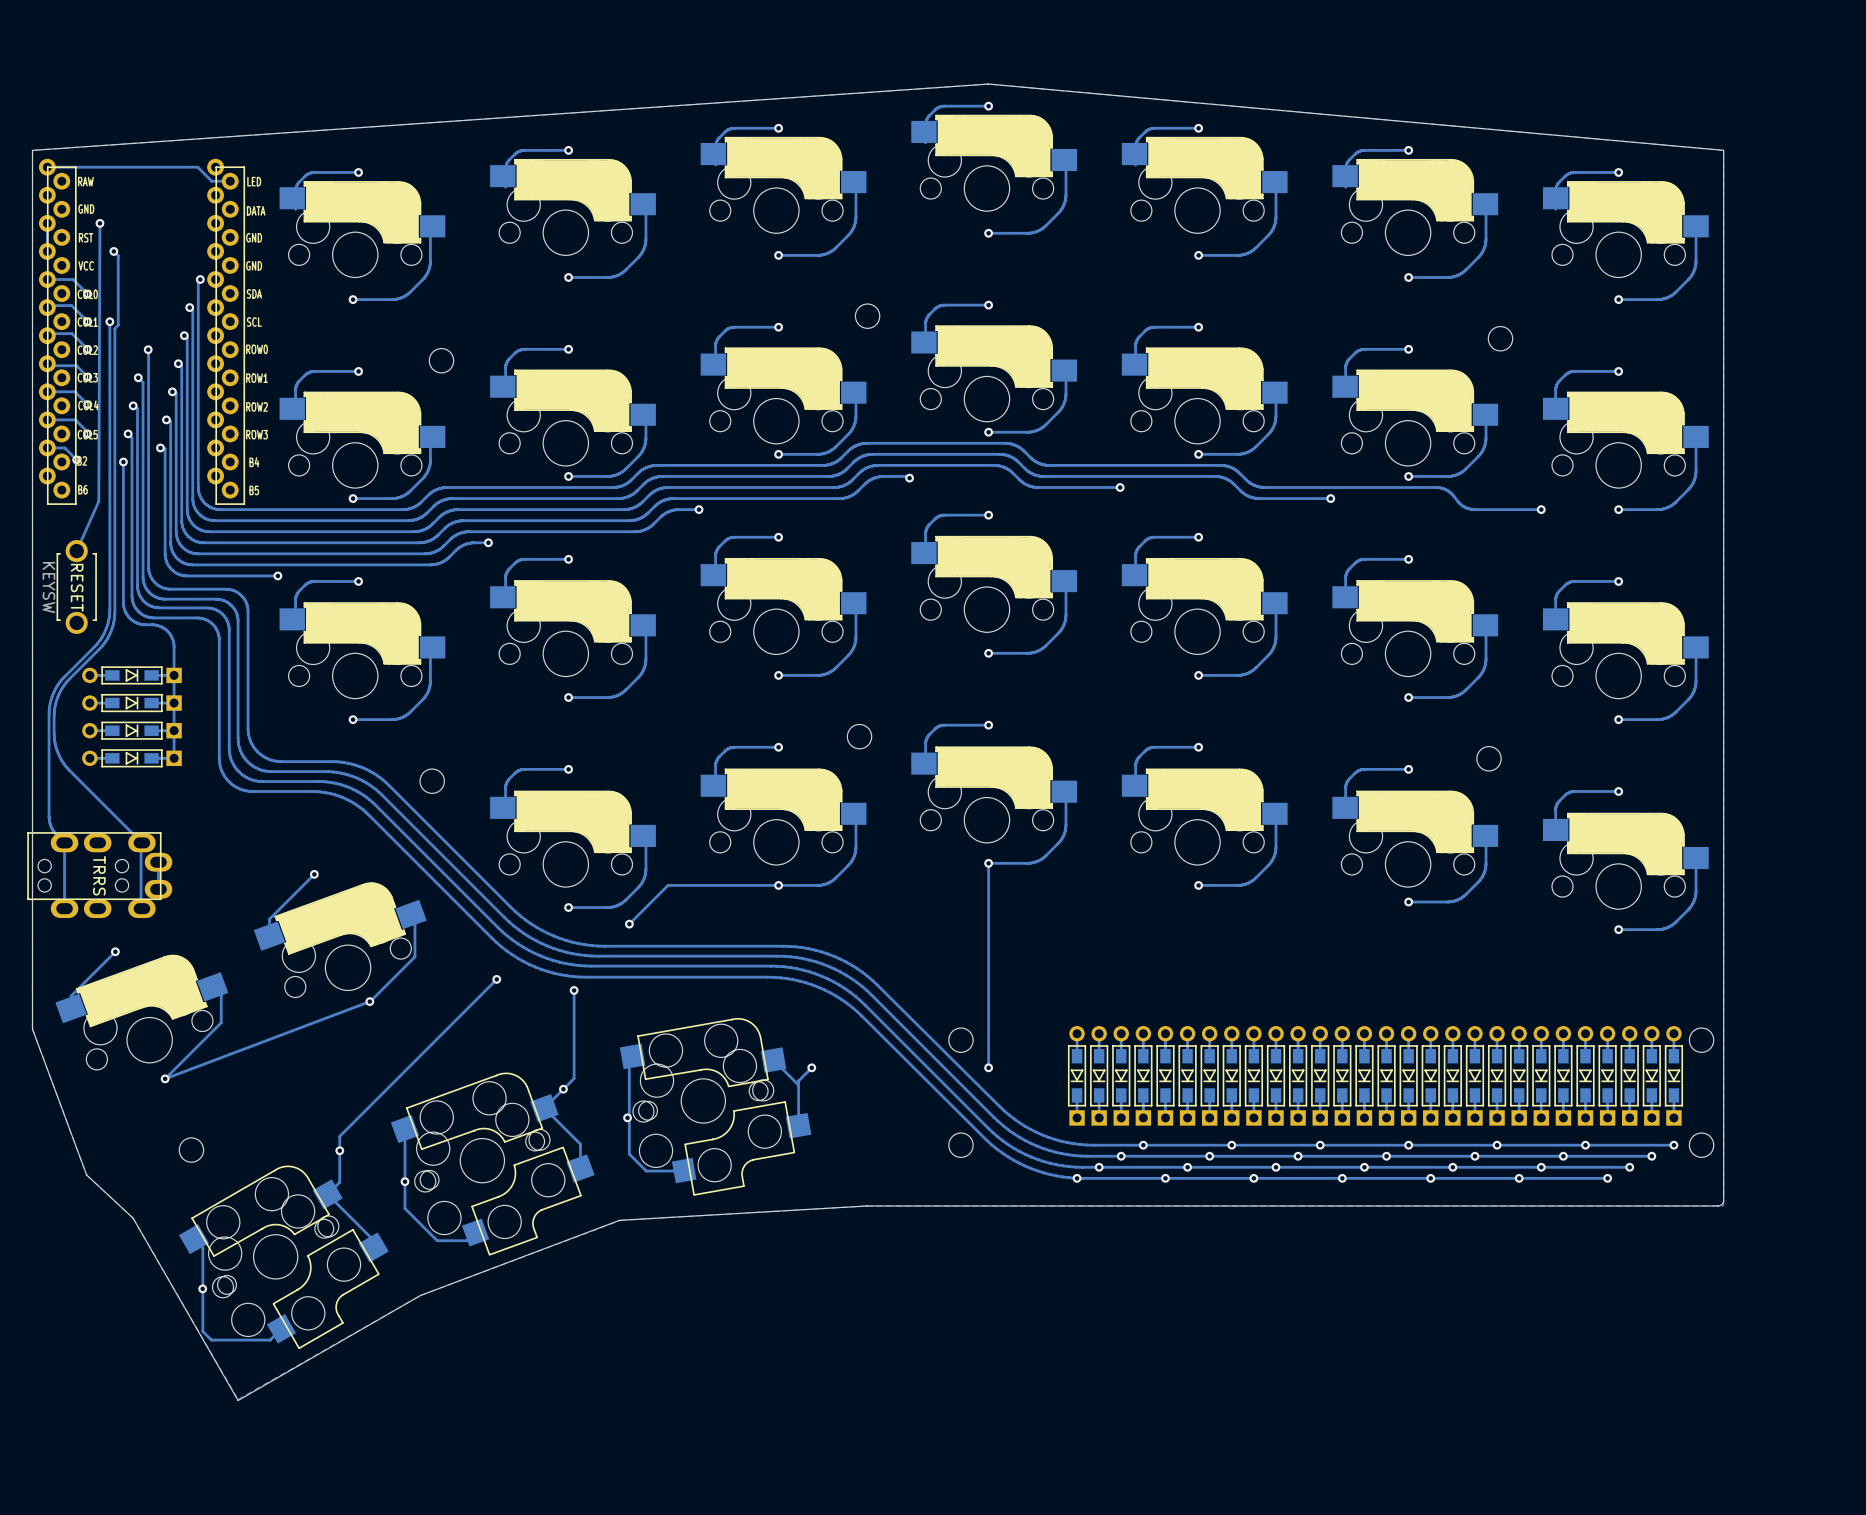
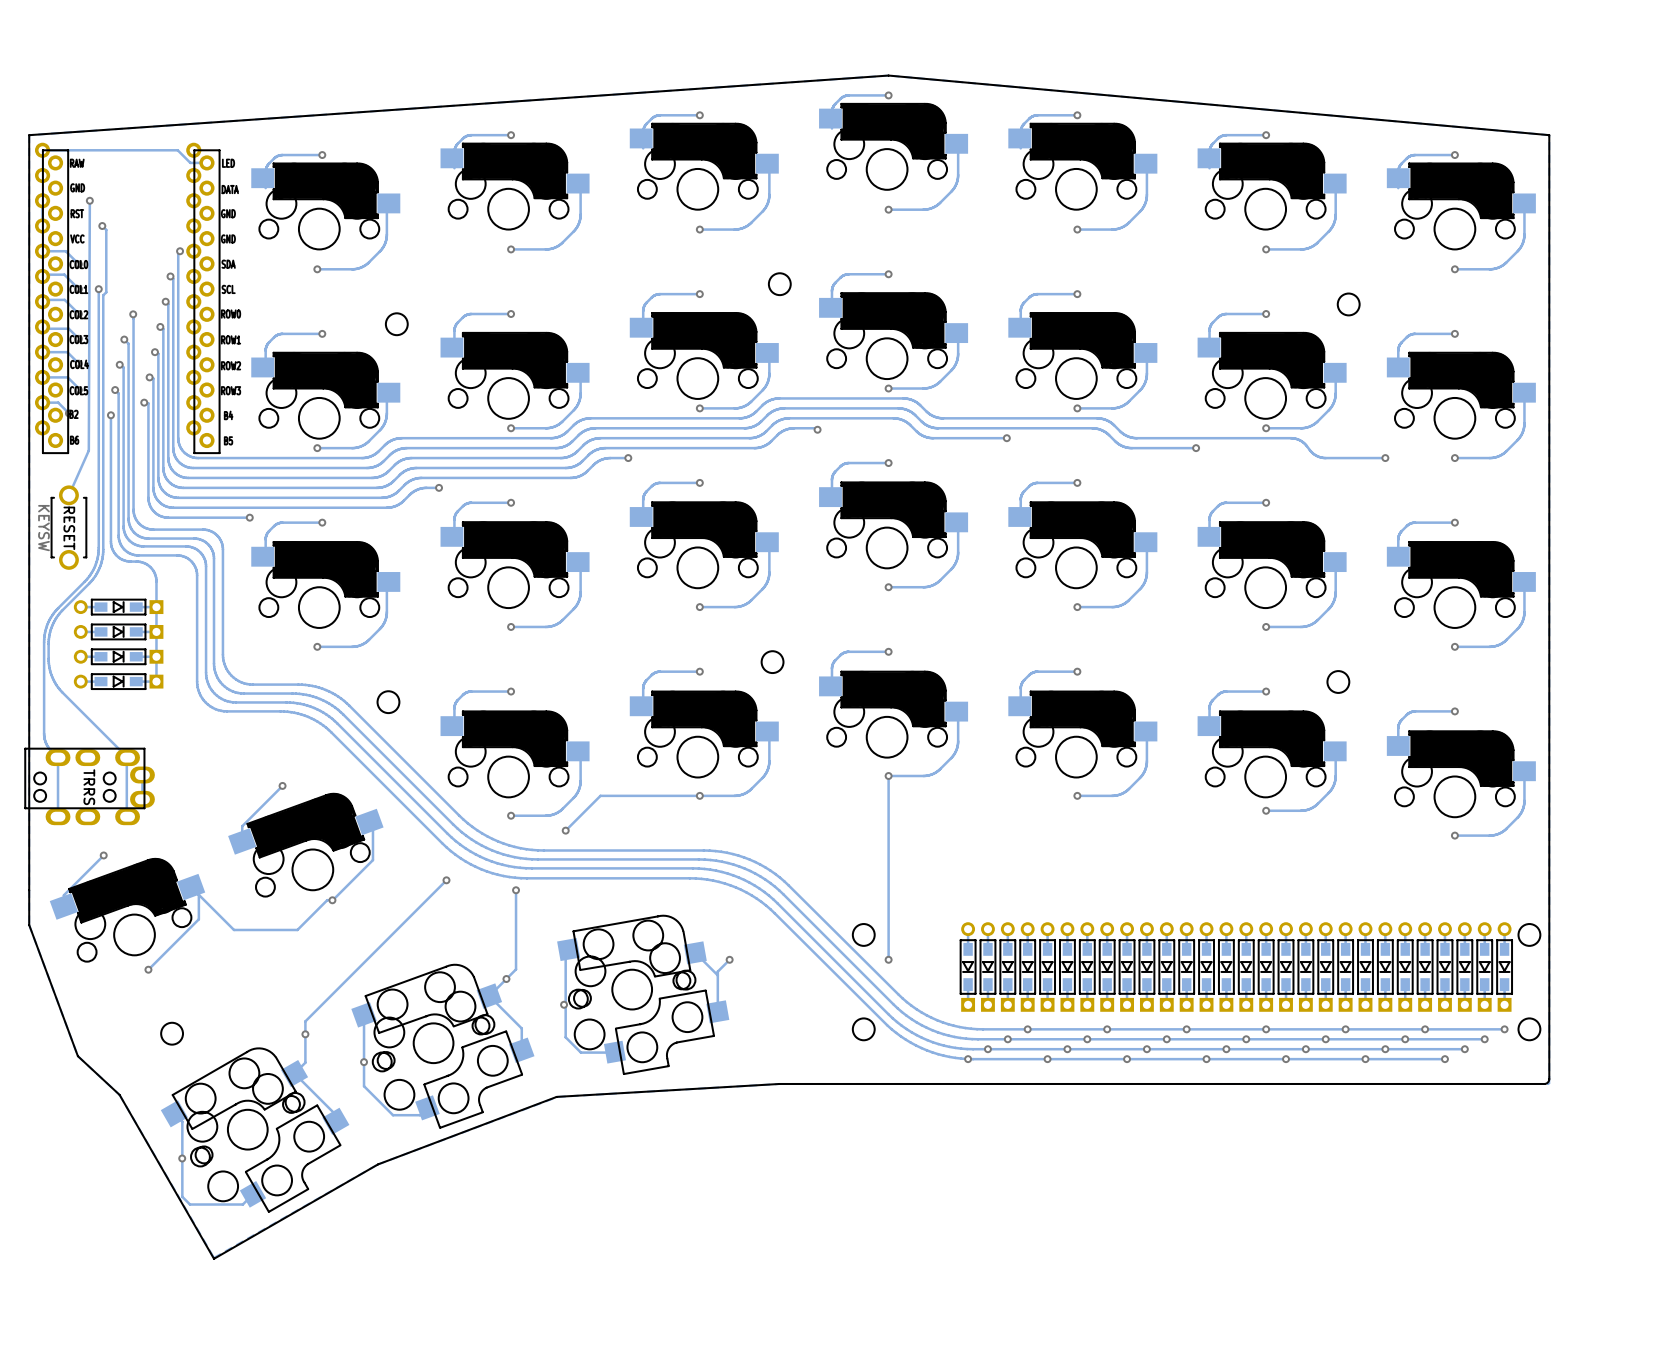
track: (370, 1001) (165, 1078) -> (332, 900) (327, 900) (297, 929) (234, 929) (198, 894)

